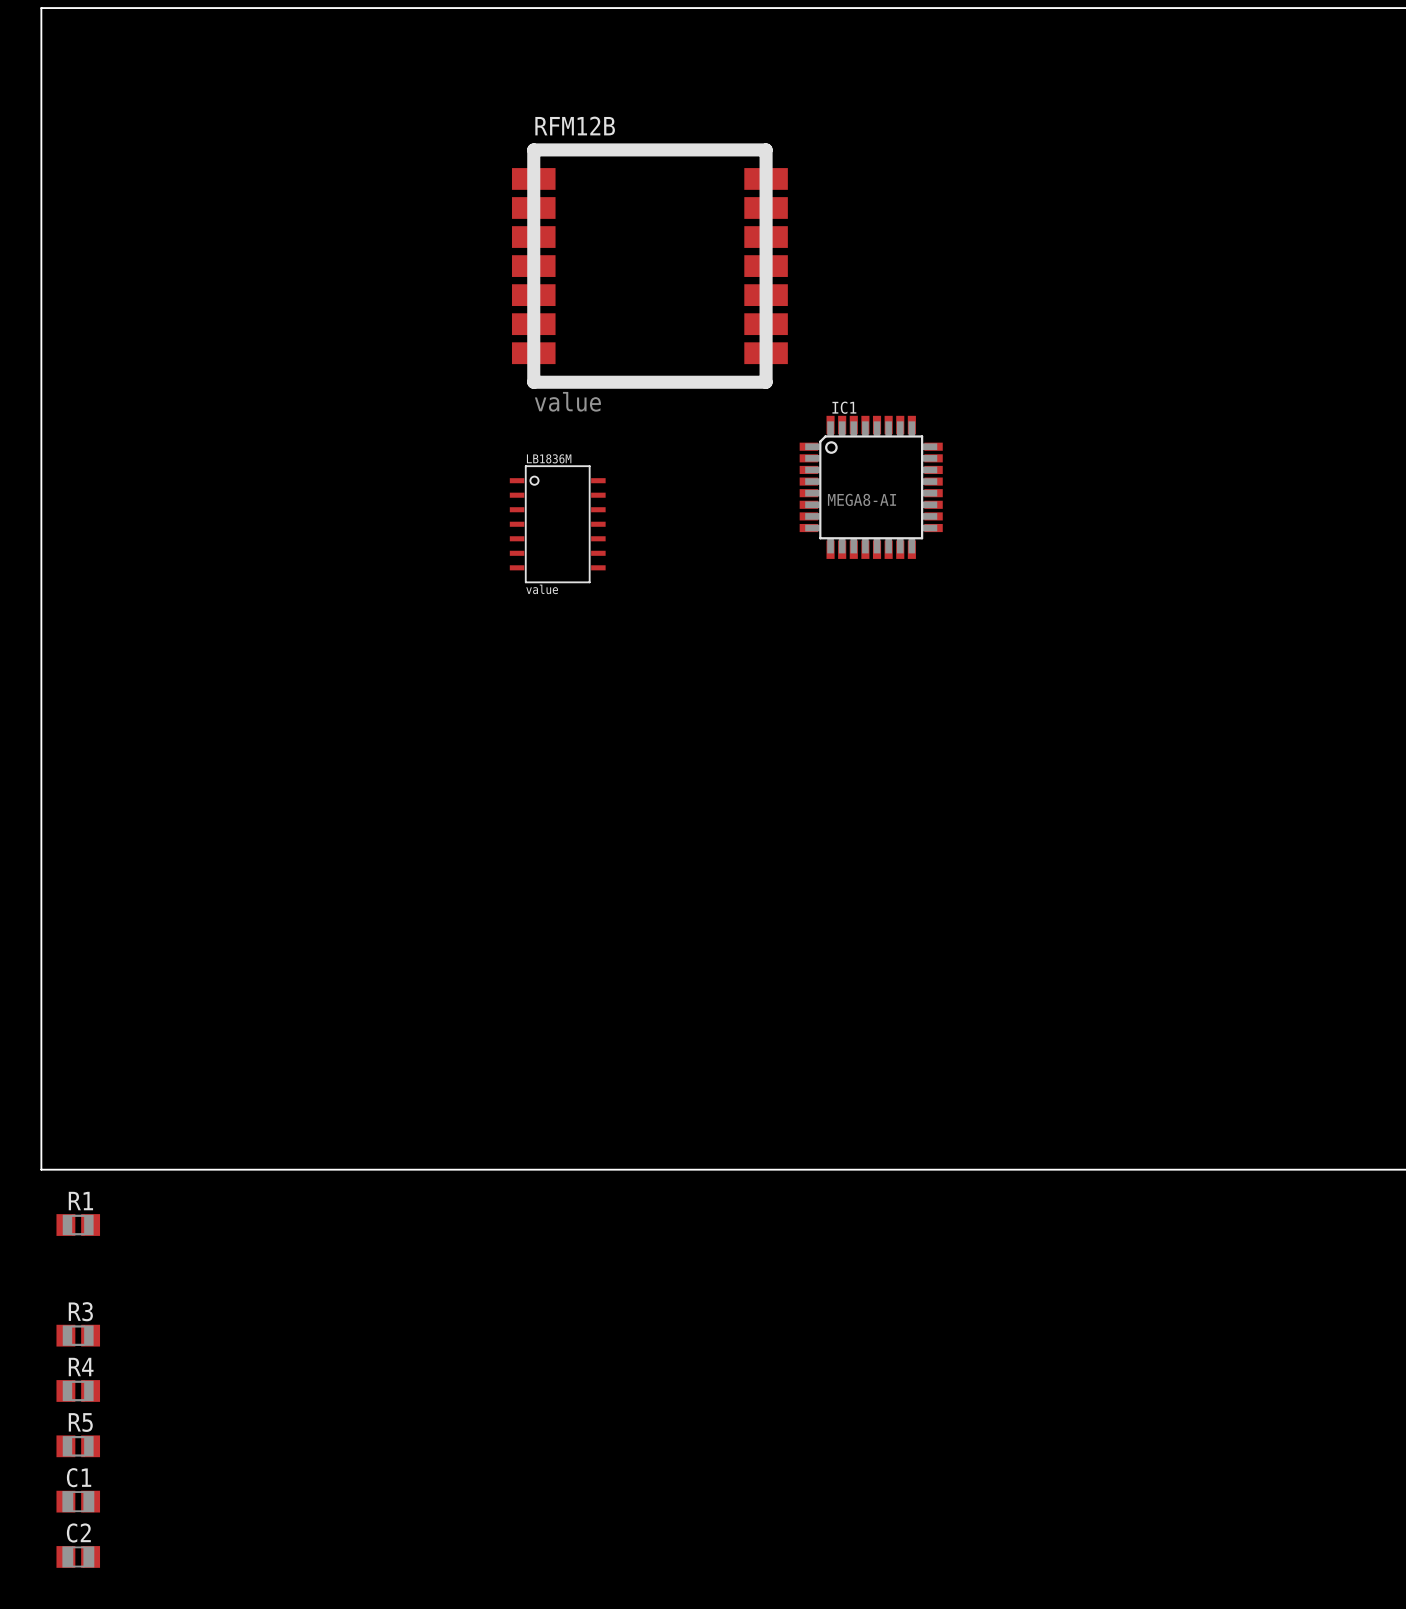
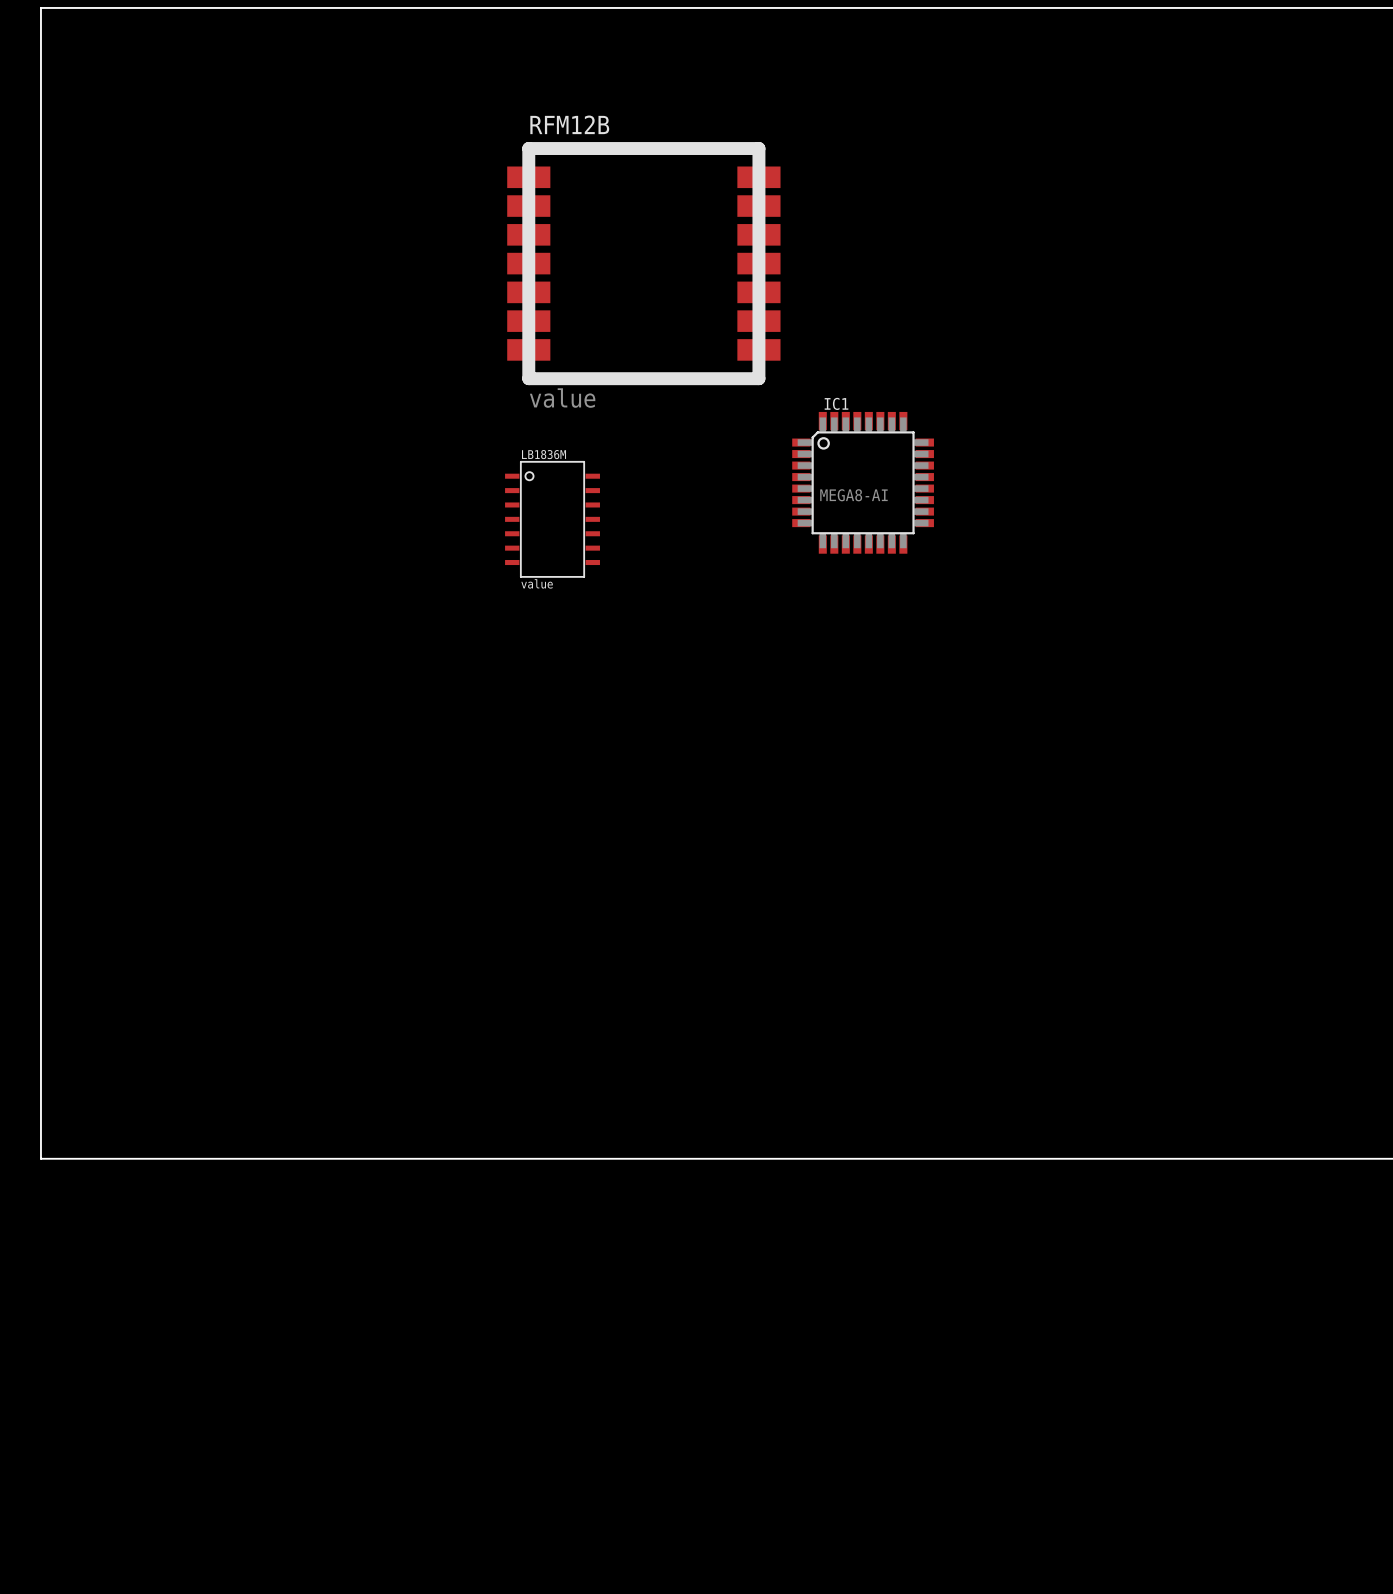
R1: (78, 1225) -> none
R3: (78, 1335) -> none
R4: (78, 1390) -> none
R5: (78, 1446) -> none
C1: (78, 1501) -> none
C2: (78, 1556) -> none

